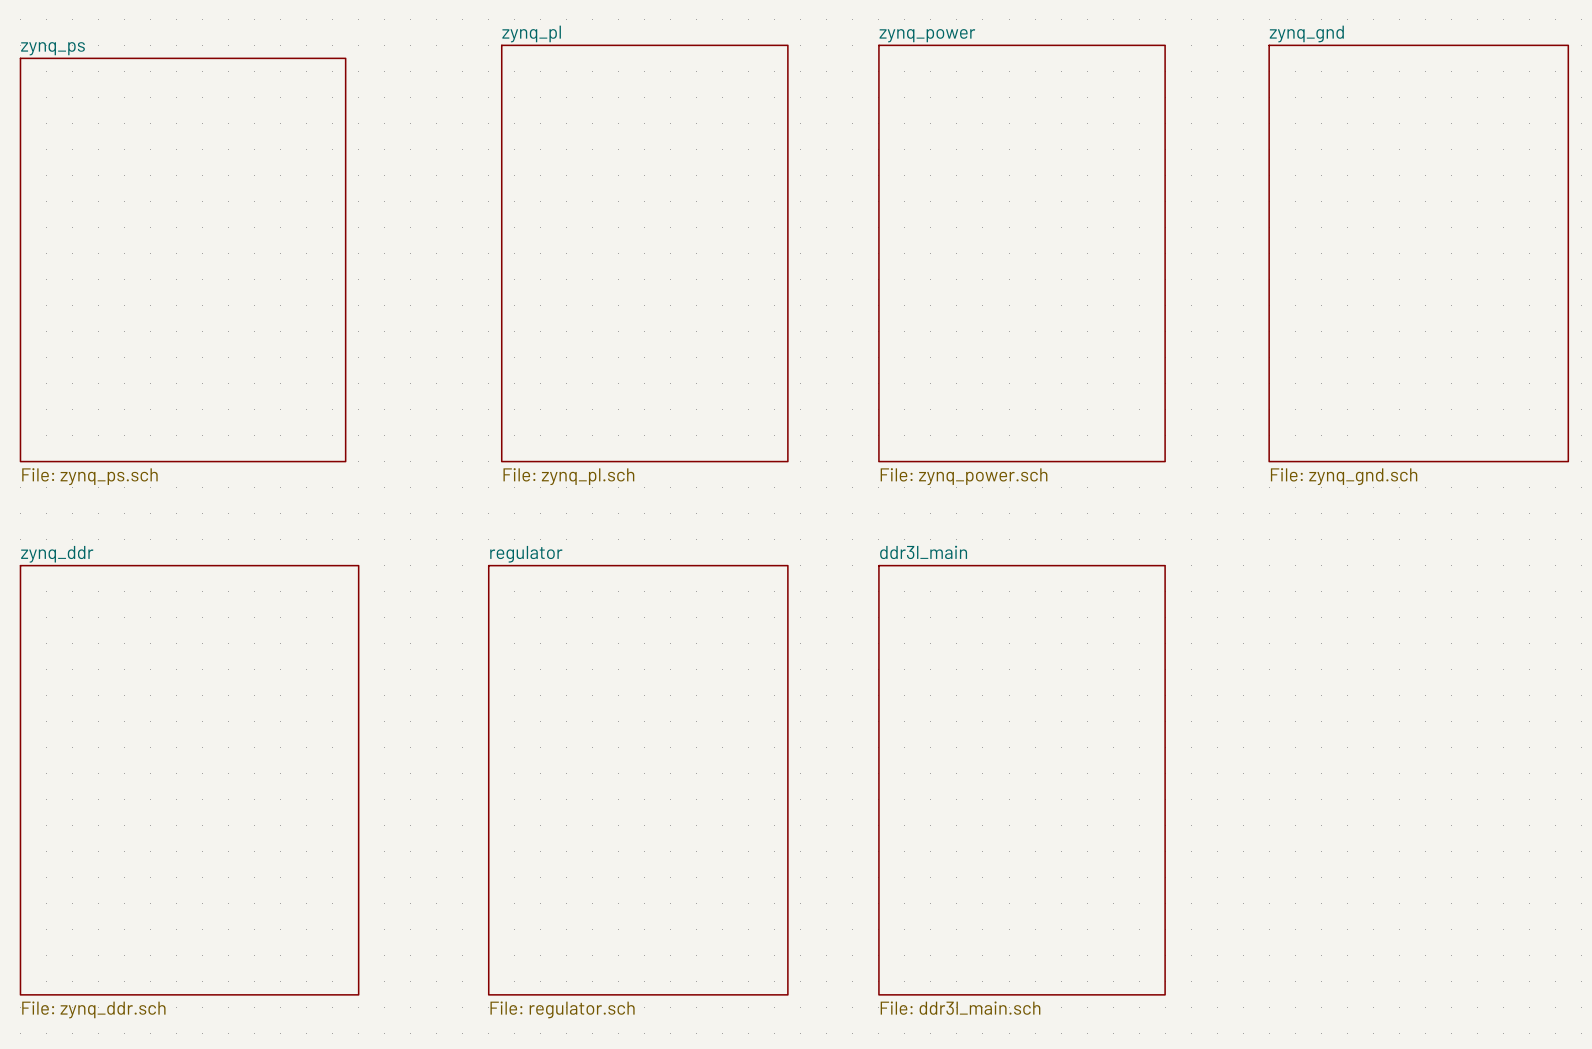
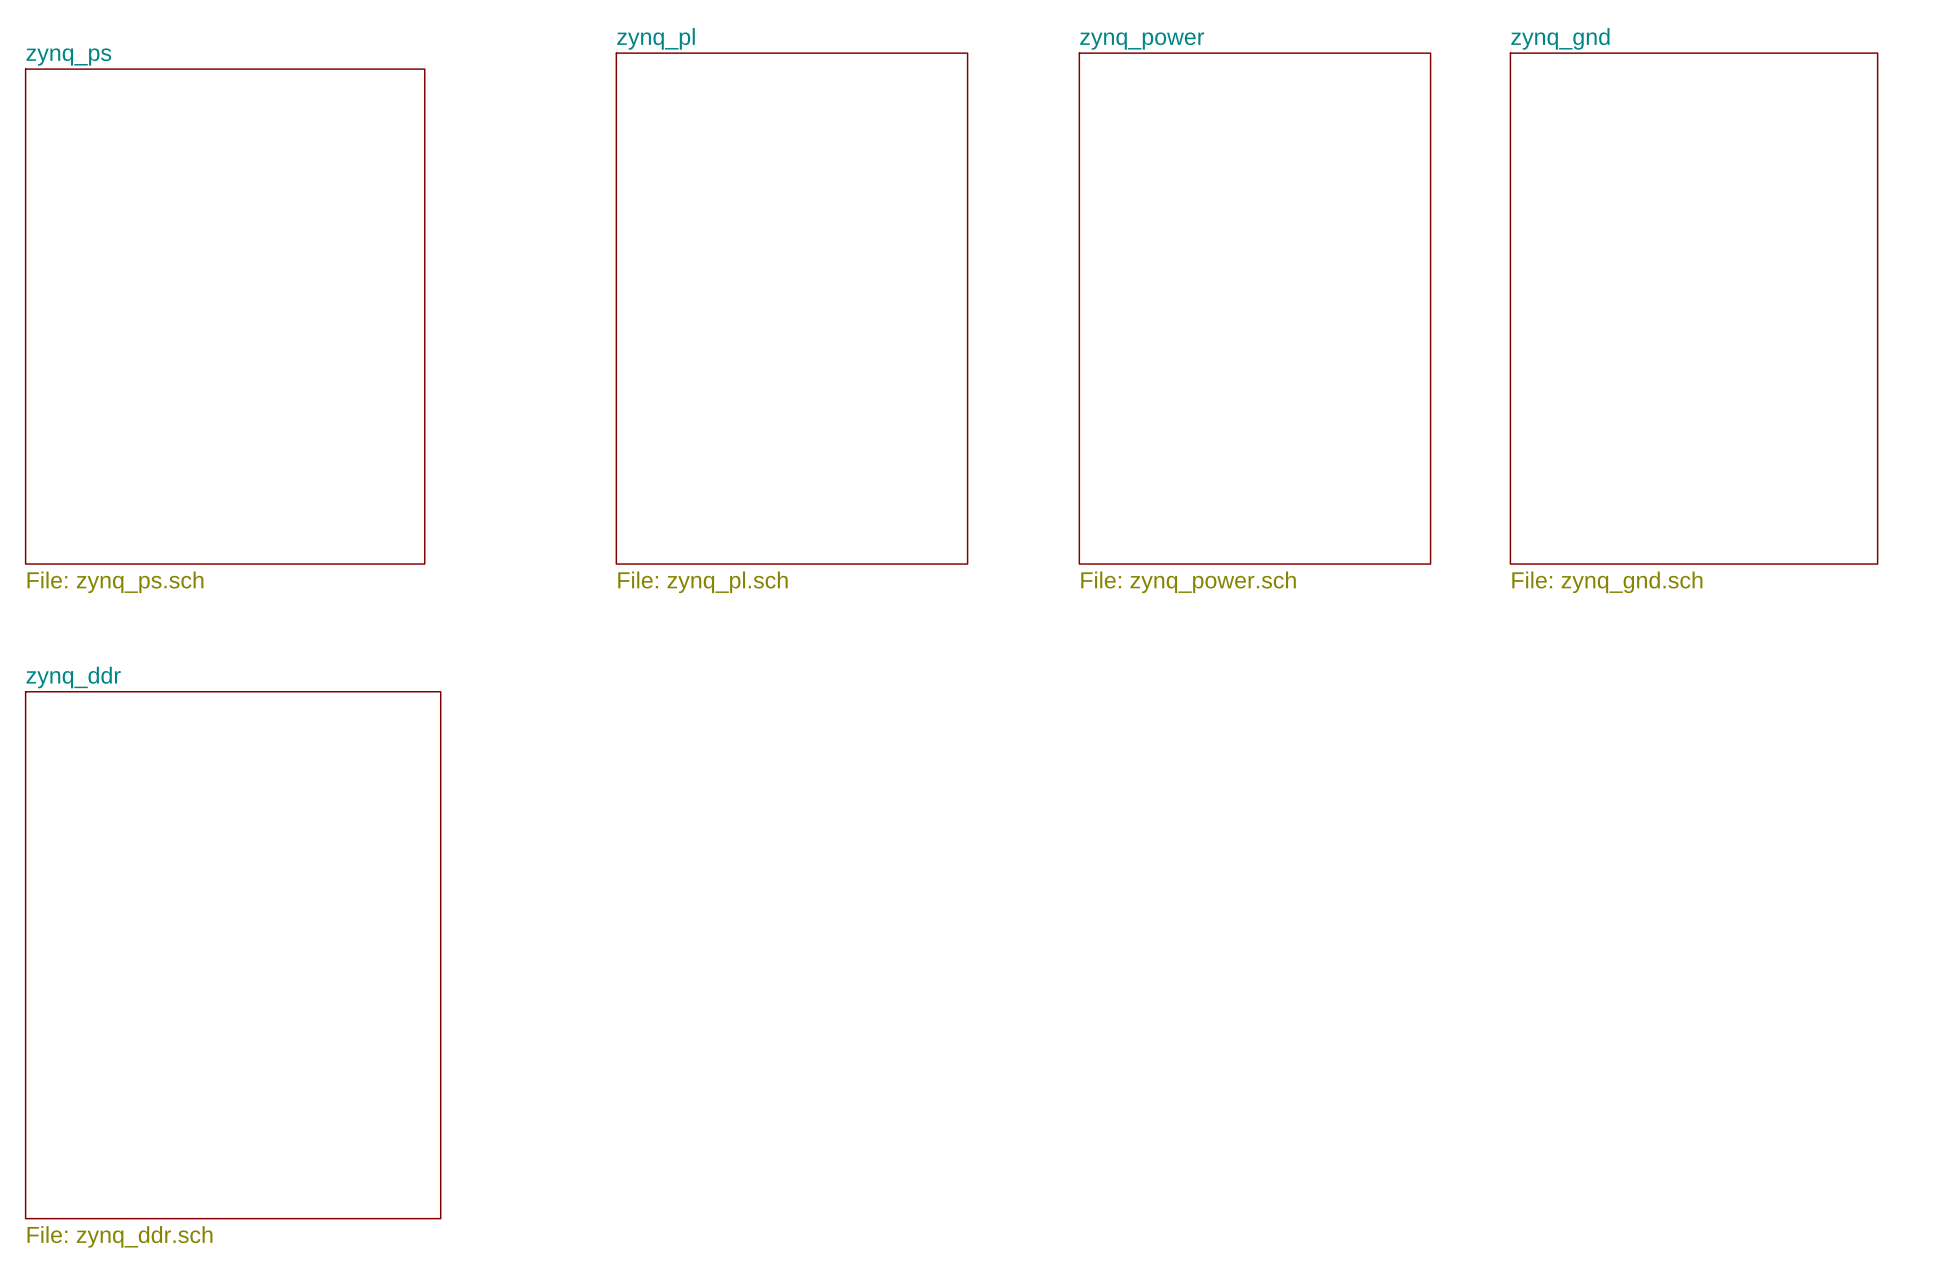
sheet zynq_gnd position: (1418, 253) -> (1694, 308)
sheet regulator: File: regulator.sch (638, 780) -> none
sheet ddr3l_main: File: ddr3l_main.sch (1022, 780) -> none

